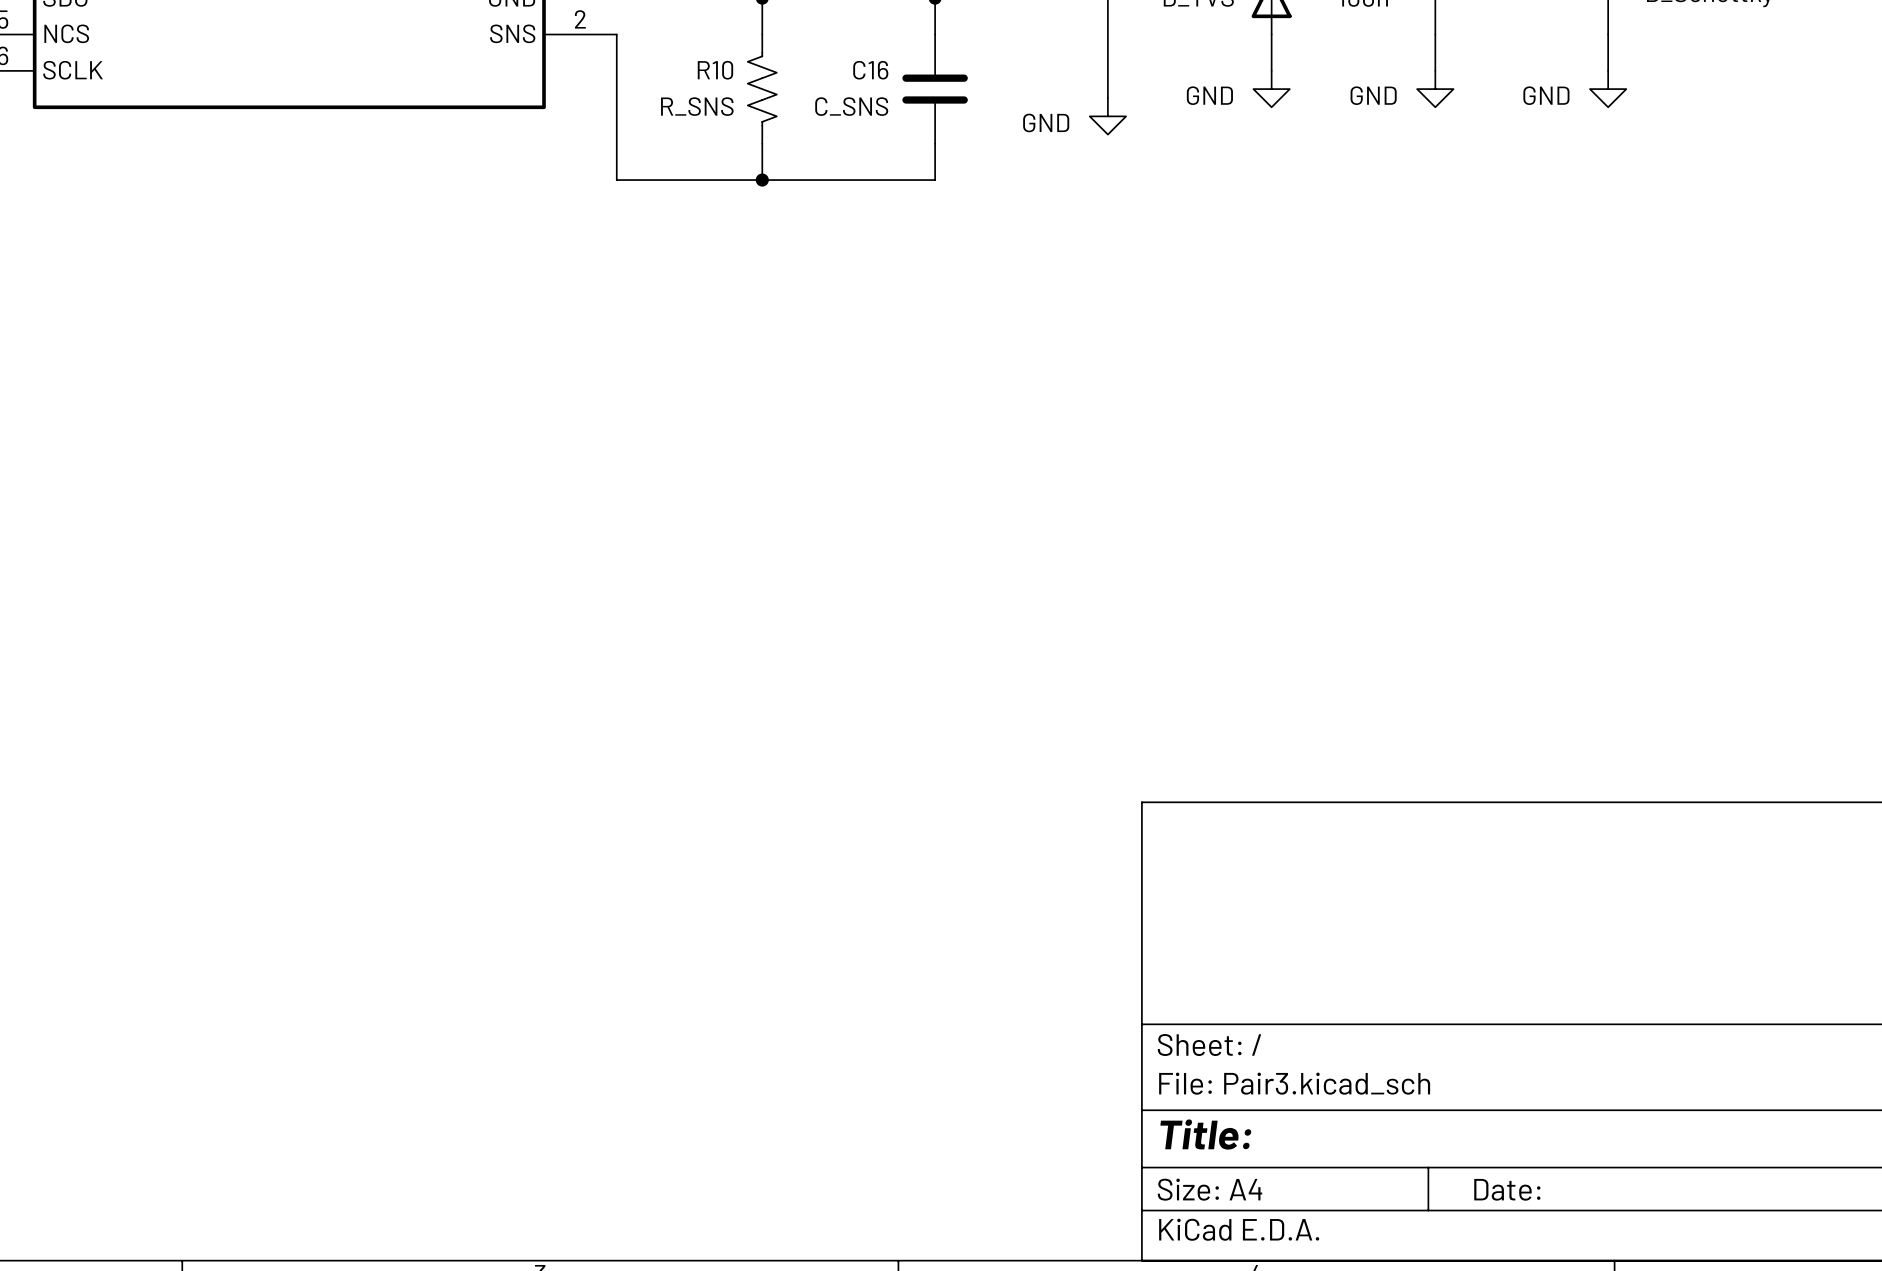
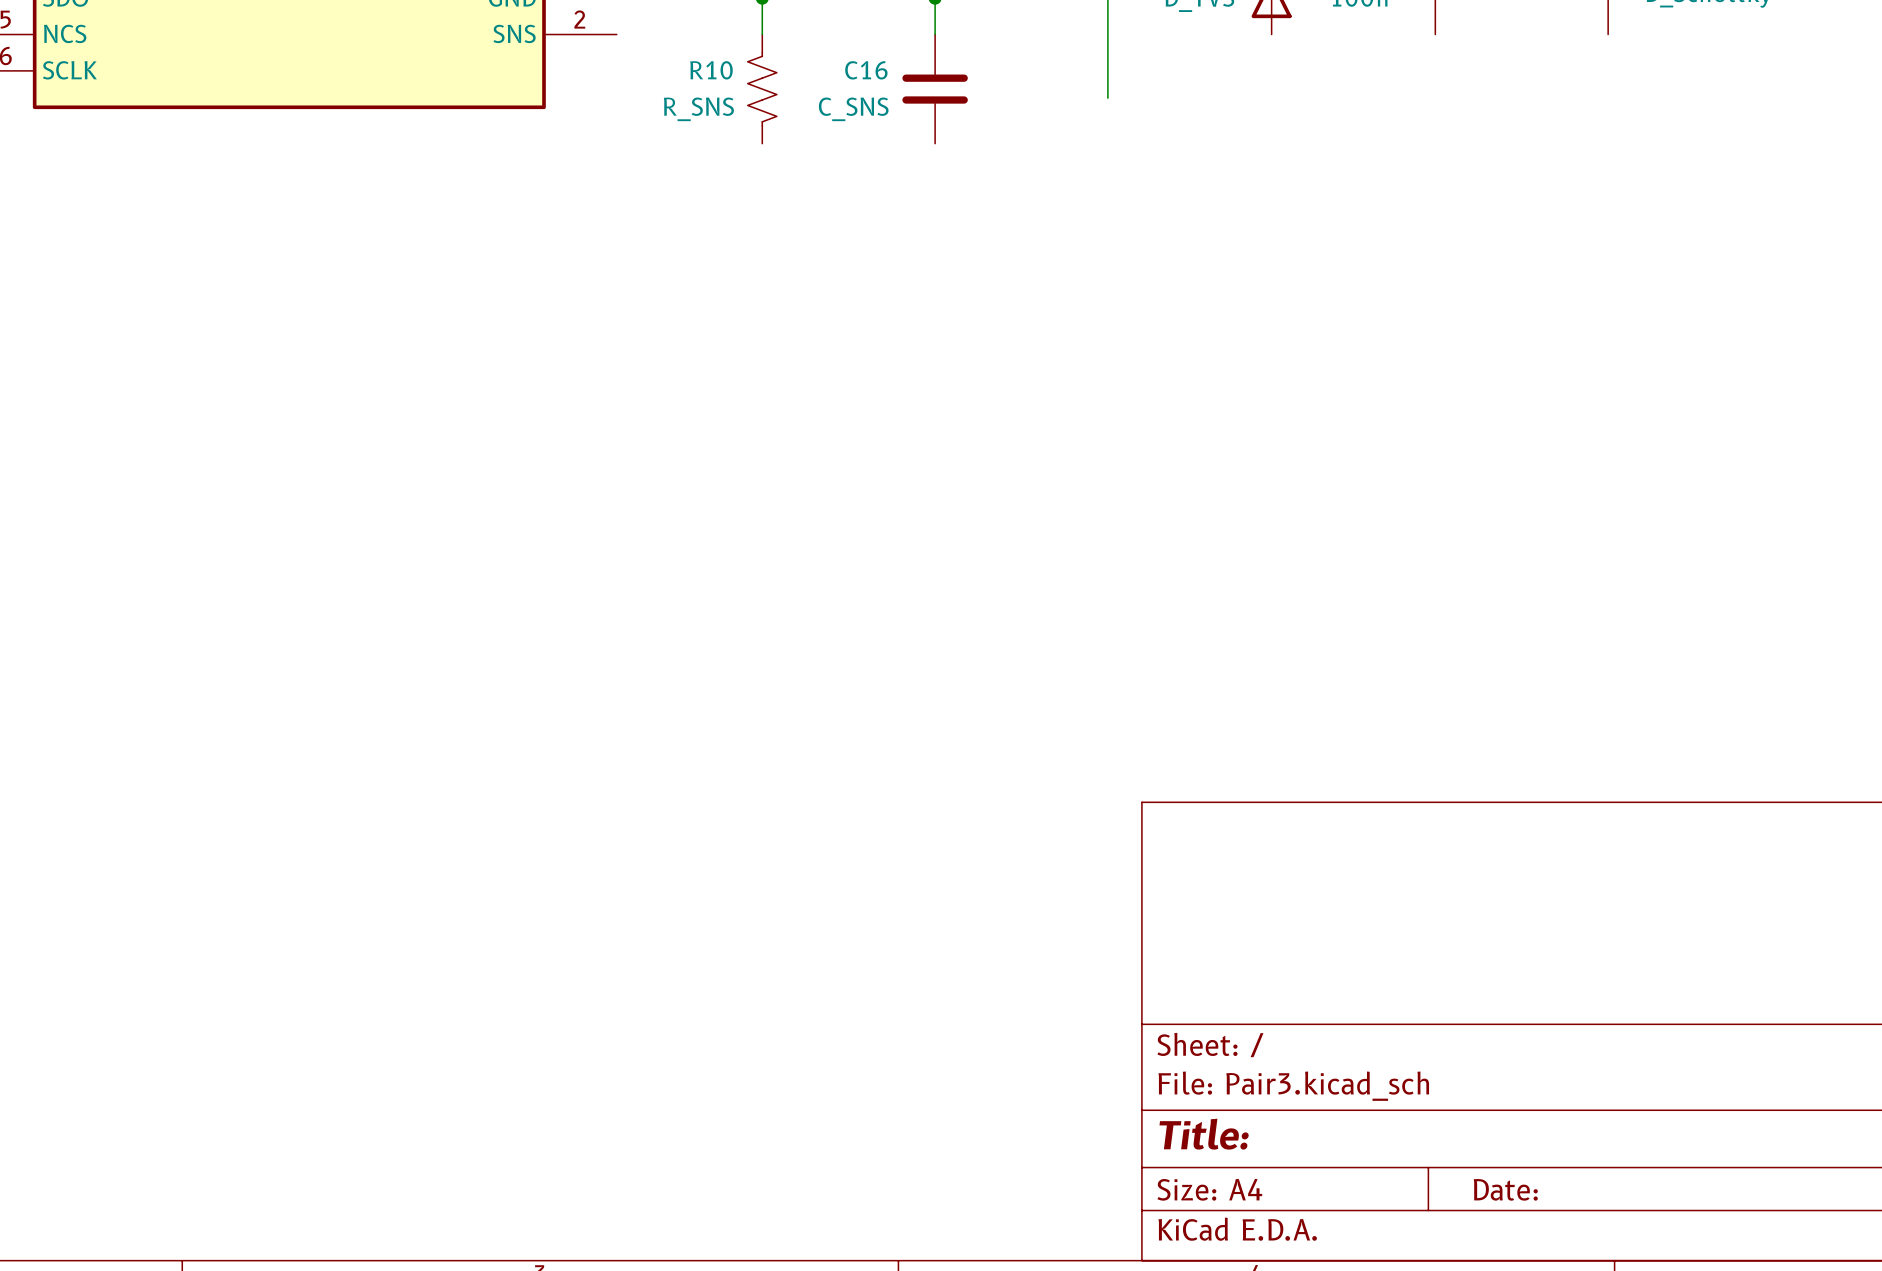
wire: (616, 34) (616, 180) (935, 180) (935, 143) -> none
wire: (1271, 34) (1271, 70) -> none
wire: (1435, 34) (1435, 70) -> none
wire: (1608, 34) (1608, 70) -> none
power symbol: GND (1271, 89) -> none
power symbol: GND (1435, 89) -> none
power symbol: GND (1608, 89) -> none
power symbol: GND (1107, 116) -> none
wire: (762, 143) (762, 180) -> none
junction: (762, 180) -> none

